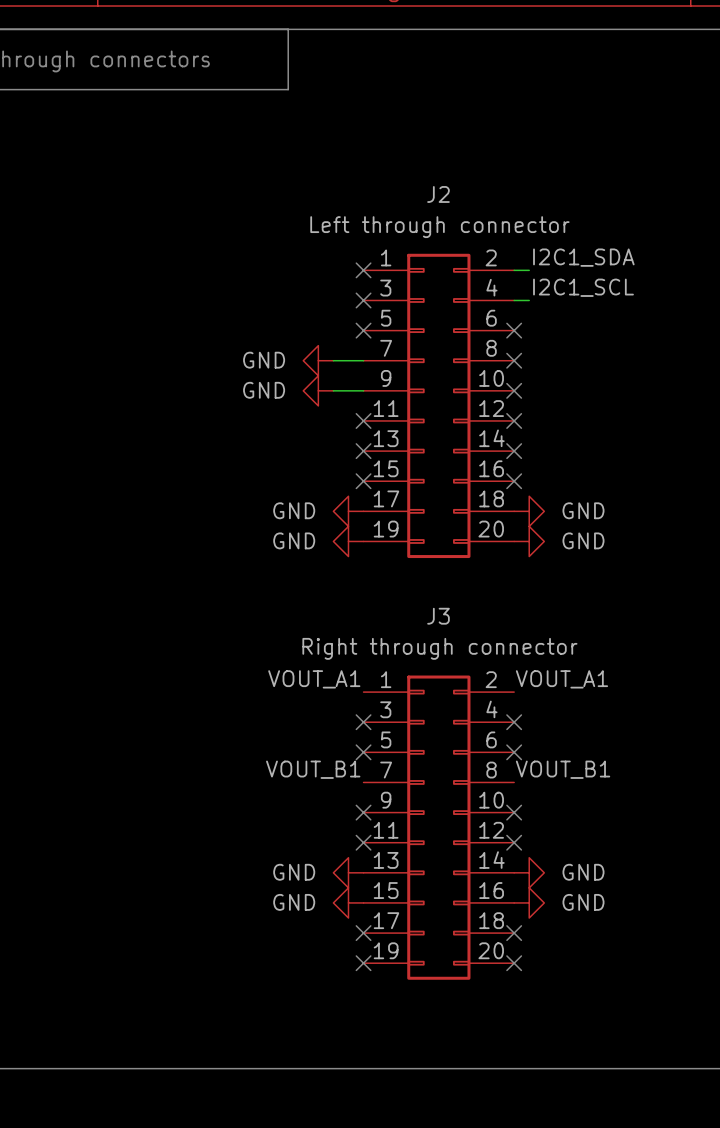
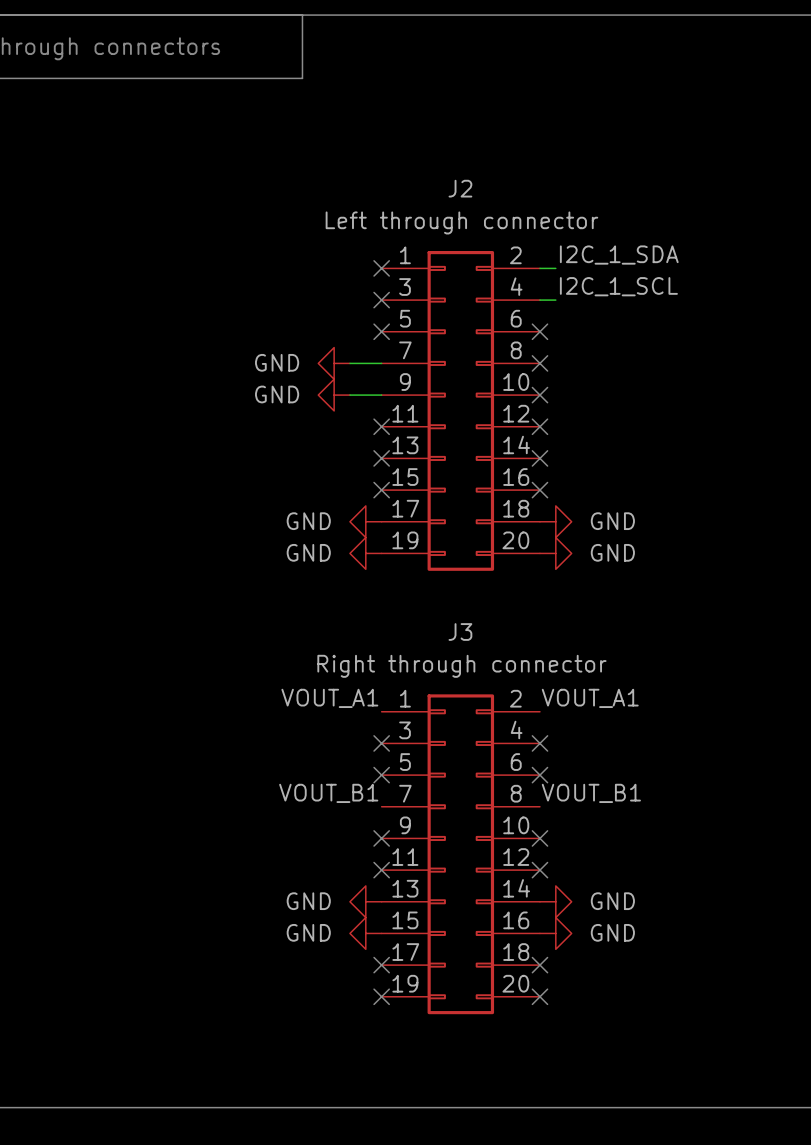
label: I2C1_SDA (583, 257) -> I2C_1_SDA (619, 255)
label: I2C1_SCL (583, 287) -> I2C_1_SCL (618, 286)

